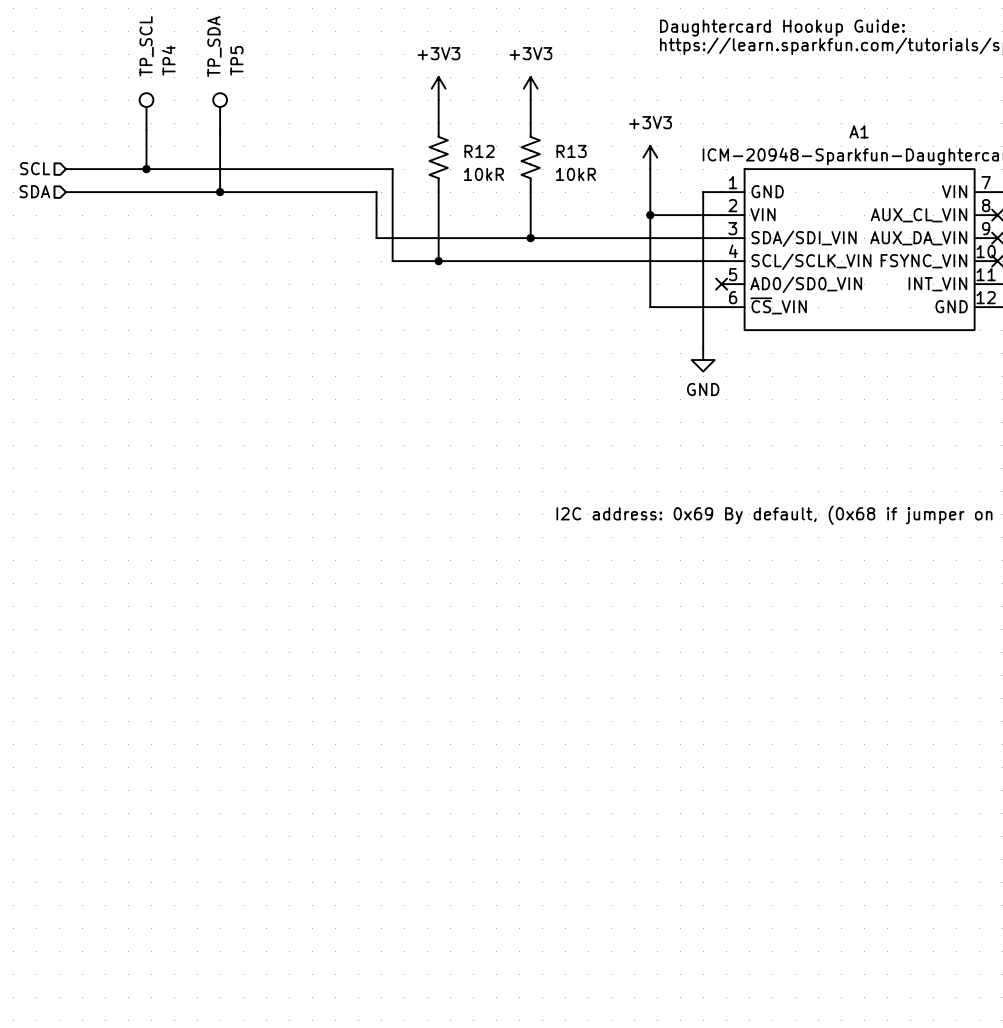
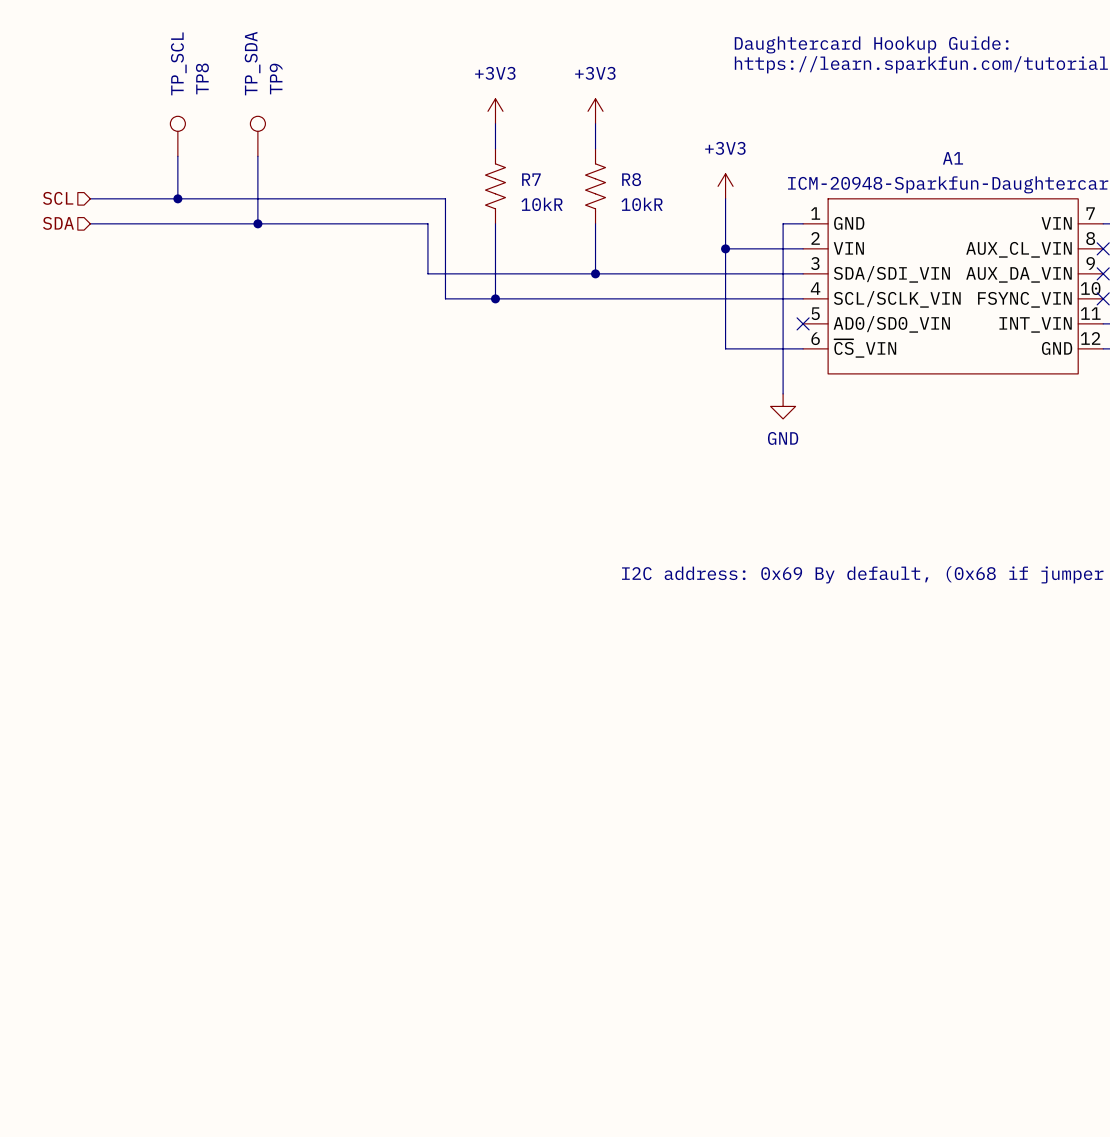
TP4 name: TP4 (168, 60) -> TP8 (202, 78)
TP5 name: TP5 (236, 60) -> TP9 (276, 79)
R12 name: R12 (479, 151) -> R7 (531, 179)
R13 name: R13 (571, 151) -> R8 (631, 179)

